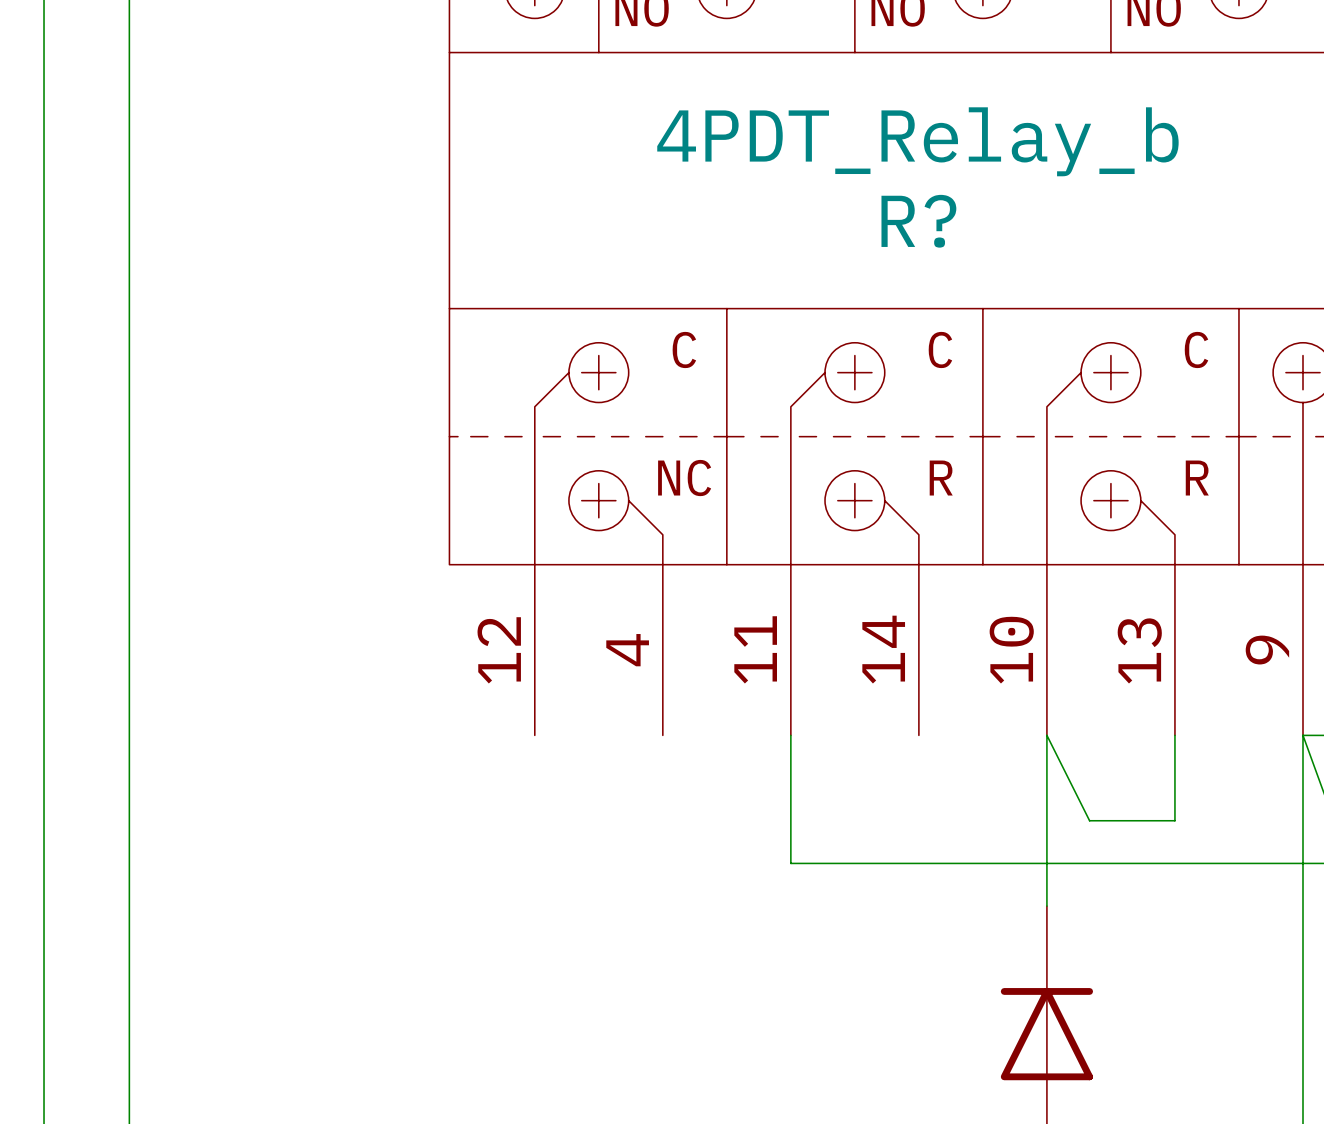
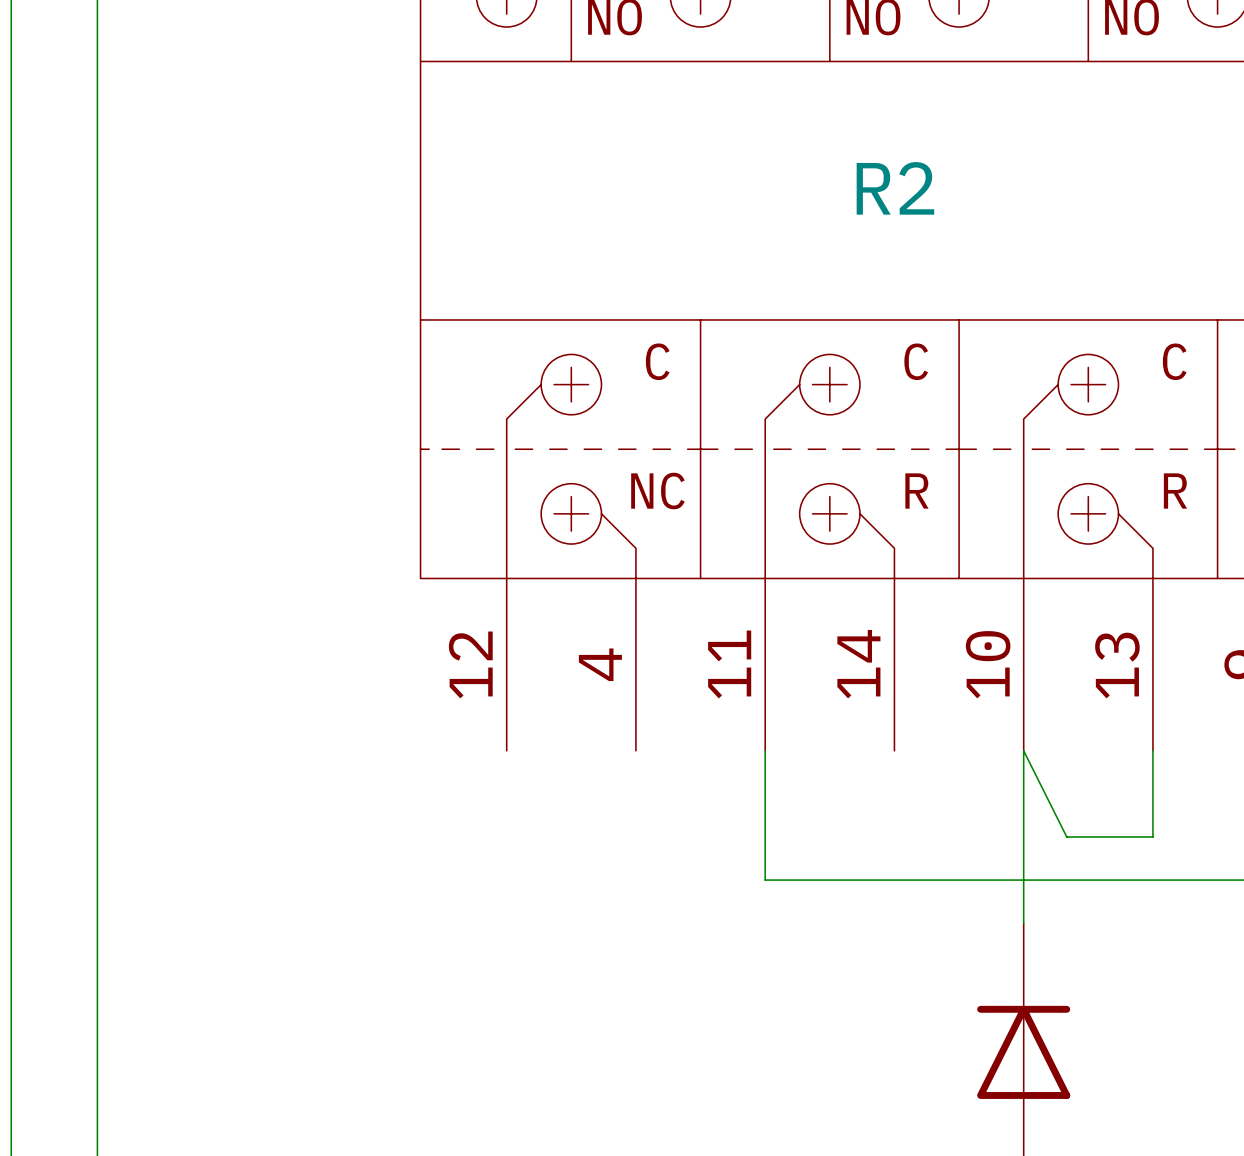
R? value: 4PDT_Relay_b (917, 141) -> none
R? name: R? (918, 221) -> R2 (895, 188)

